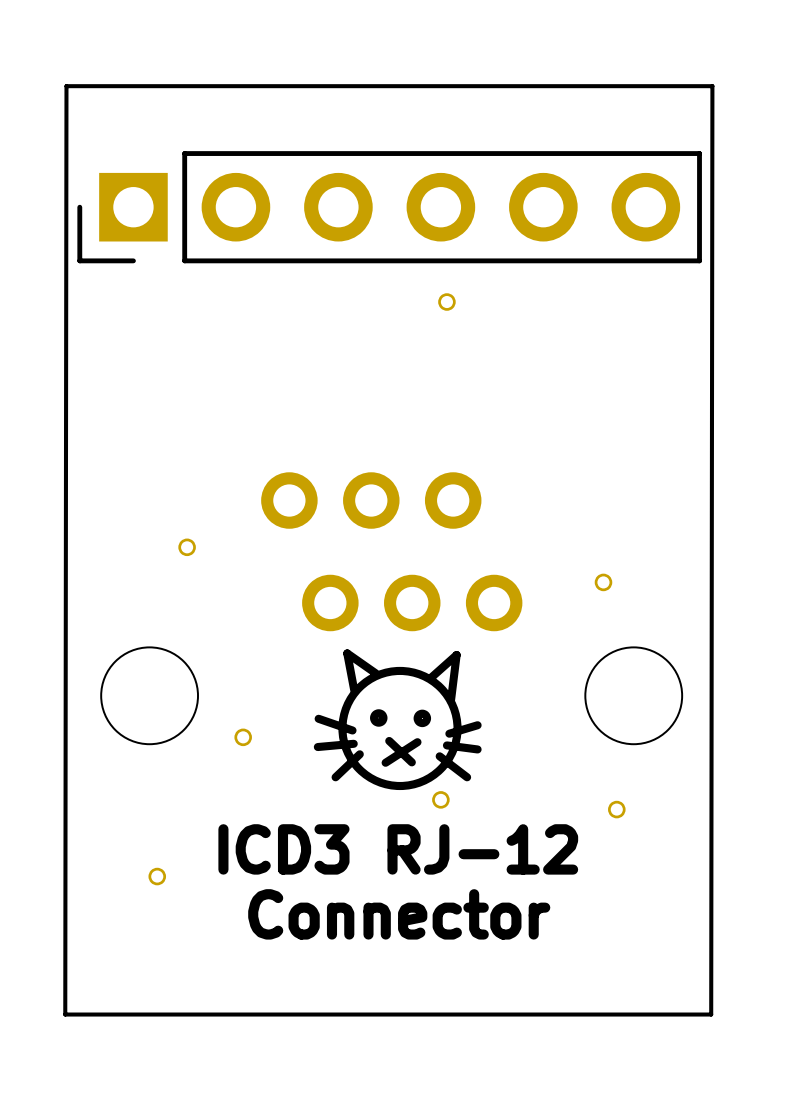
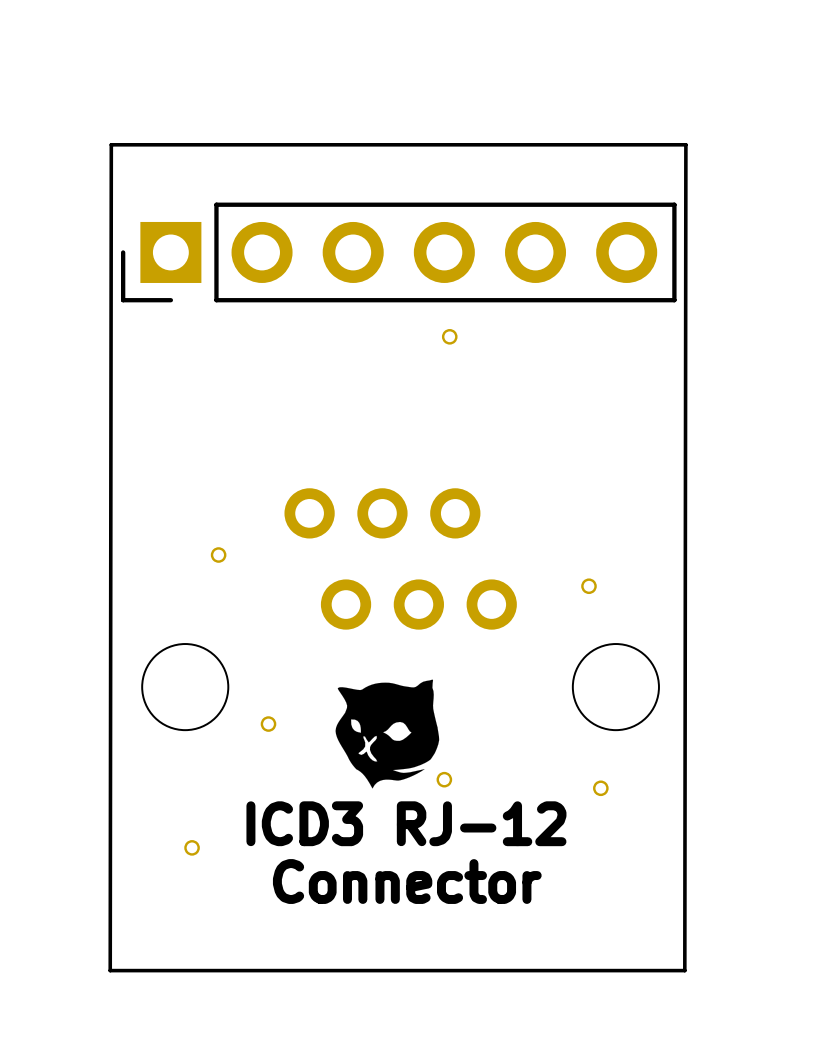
drawing: [338, 666, 462, 791] -> none
line: (375, 673) (347, 653) (354, 689) -> none
line: (430, 678) (456, 655) (450, 700) -> none
drawing: none -> [335, 679, 440, 789]
line: (318, 718) (352, 730) -> none
line: (477, 725) (449, 733) -> none
line: (389, 740) (411, 762) -> none
line: (417, 742) (385, 762) -> none
line: (353, 743) (317, 747) -> none
line: (446, 745) (477, 749) -> none
line: (359, 754) (335, 777) -> none
line: (439, 756) (467, 777) -> none

